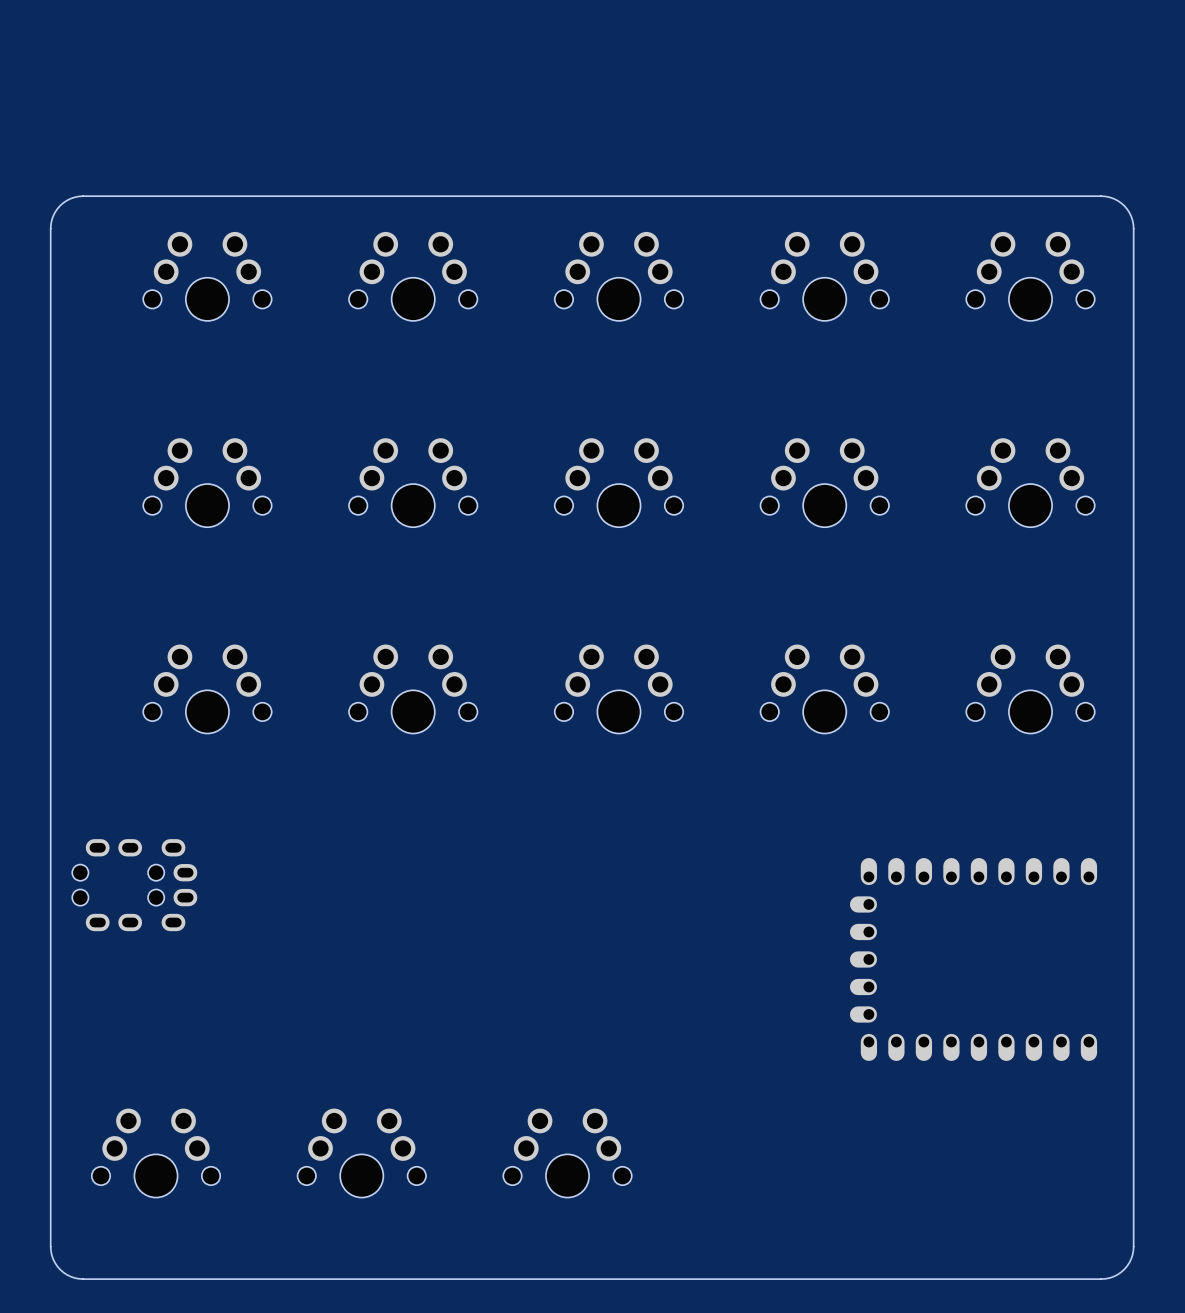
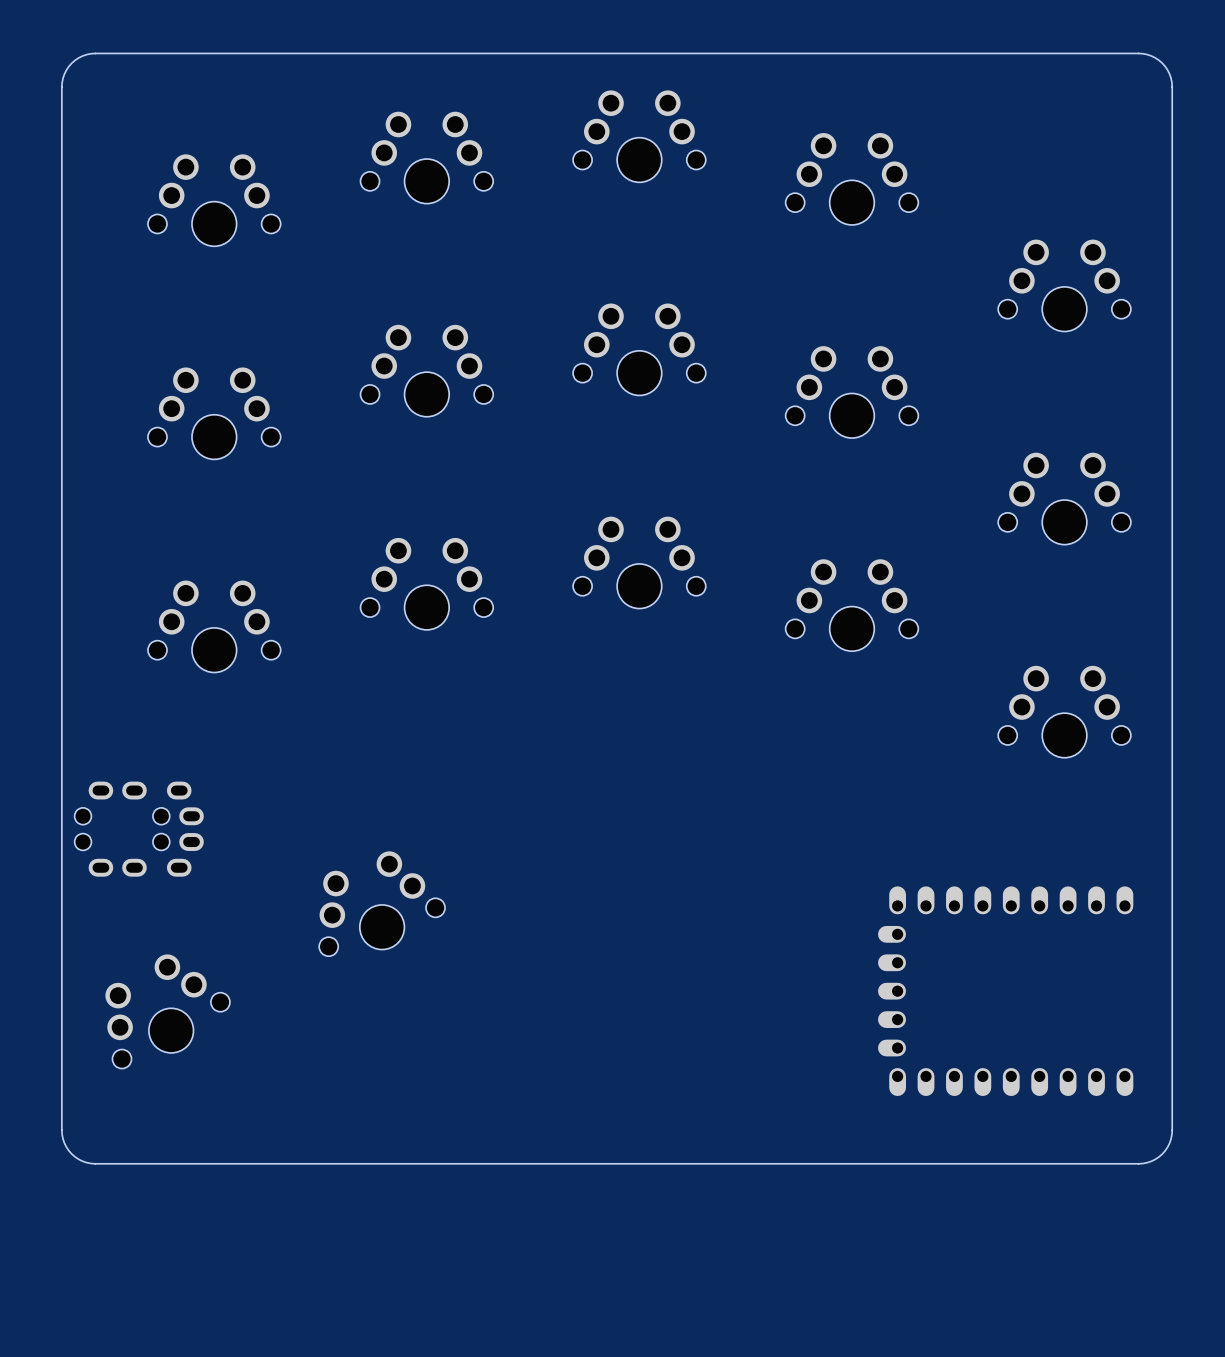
part: none -> (639, 136)
part: none -> (426, 157)
part: none -> (851, 178)
part: none -> (214, 200)
board edge: (1101, 196) (83, 196) (70, 198) (60, 205) (53, 216) (50, 228) (50, 1246) (53, 1259) (60, 1269) (70, 1276) (83, 1279) (1101, 1279) (1113, 1276) (1124, 1269) (1131, 1259) (1133, 1246) (1133, 228) (1131, 216) (1124, 205) (1113, 198) (1101, 196) -> (1138, 53) (1151, 56) (1162, 63) (1169, 74) (1172, 87) (1172, 1130) (1169, 1143) (1162, 1153) (1151, 1161) (1138, 1163) (95, 1163) (82, 1161) (71, 1153) (64, 1143) (61, 1130) (61, 87) (64, 74) (71, 63) (82, 56) (95, 53) (1138, 53)
part: (207, 276) -> none
part: (413, 276) -> none
part position: (618, 276) -> (639, 349)
part: (824, 276) -> none
part: none -> (426, 370)
part: none -> (851, 392)
part: none -> (214, 413)
part: (207, 482) -> none
part: (413, 482) -> none
part position: (618, 482) -> (639, 562)
part: (824, 482) -> none
part: none -> (426, 583)
part: none -> (851, 605)
part: none -> (214, 626)
part: (207, 689) -> none
part: (413, 689) -> none
part: (618, 689) -> none
part: (824, 689) -> none
part: none -> (382, 903)
part position: (134, 885) -> (139, 829)
part: none -> (167, 1011)
part: (156, 1153) -> none
part: (361, 1153) -> none
part: (567, 1153) -> none

